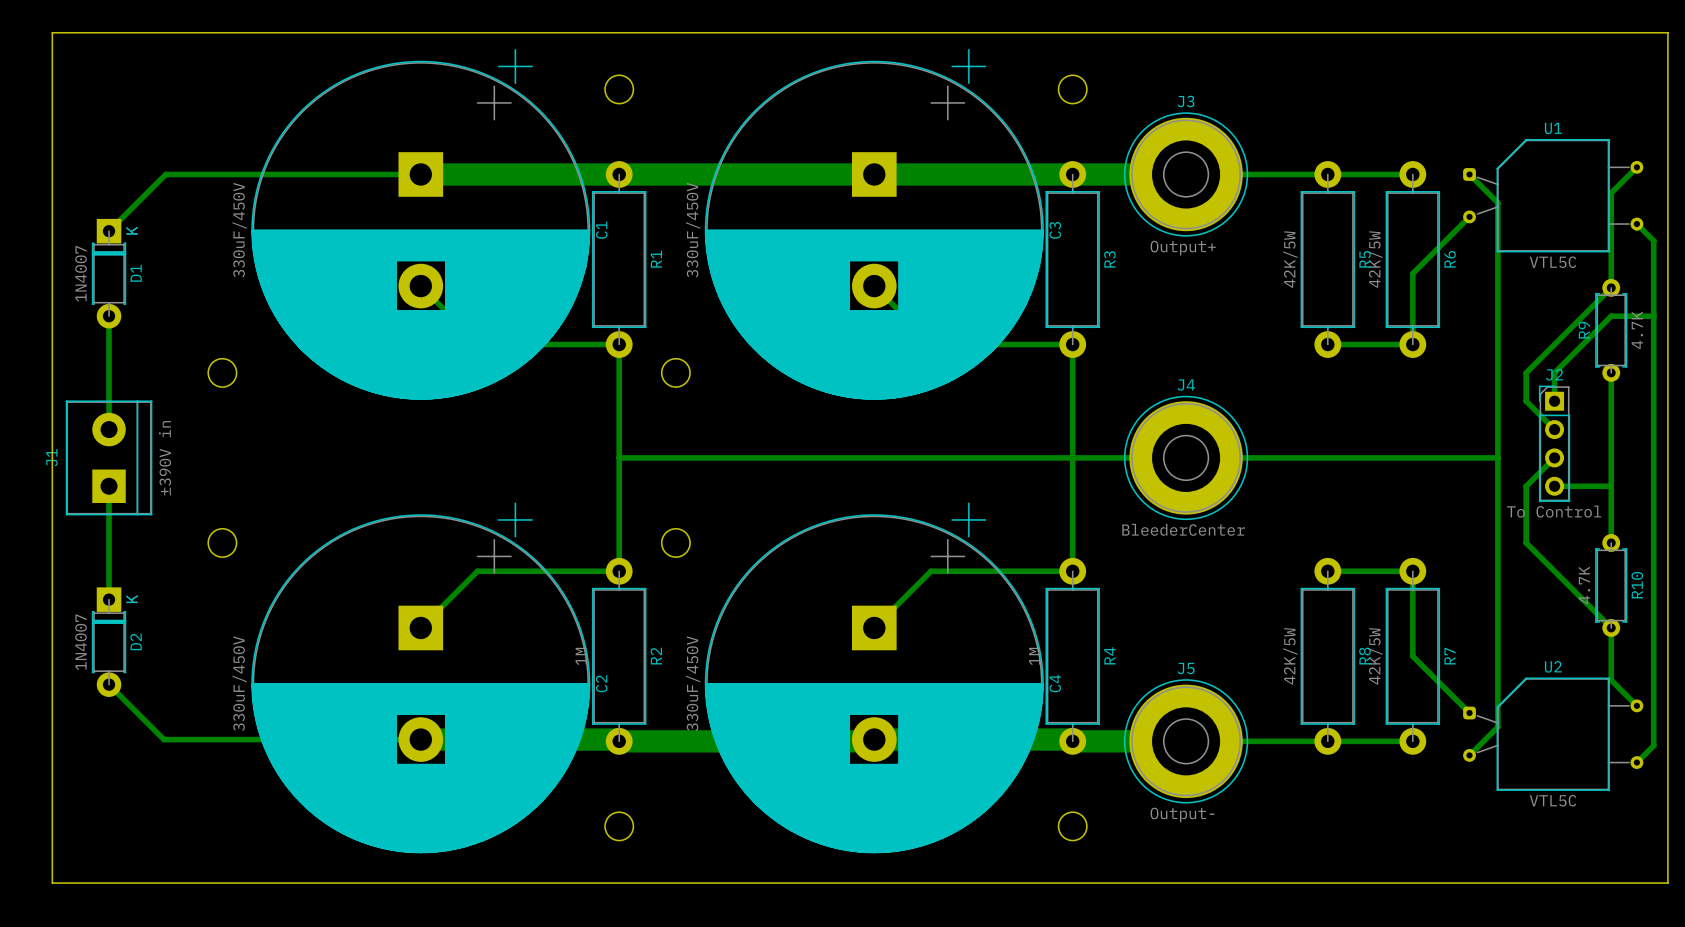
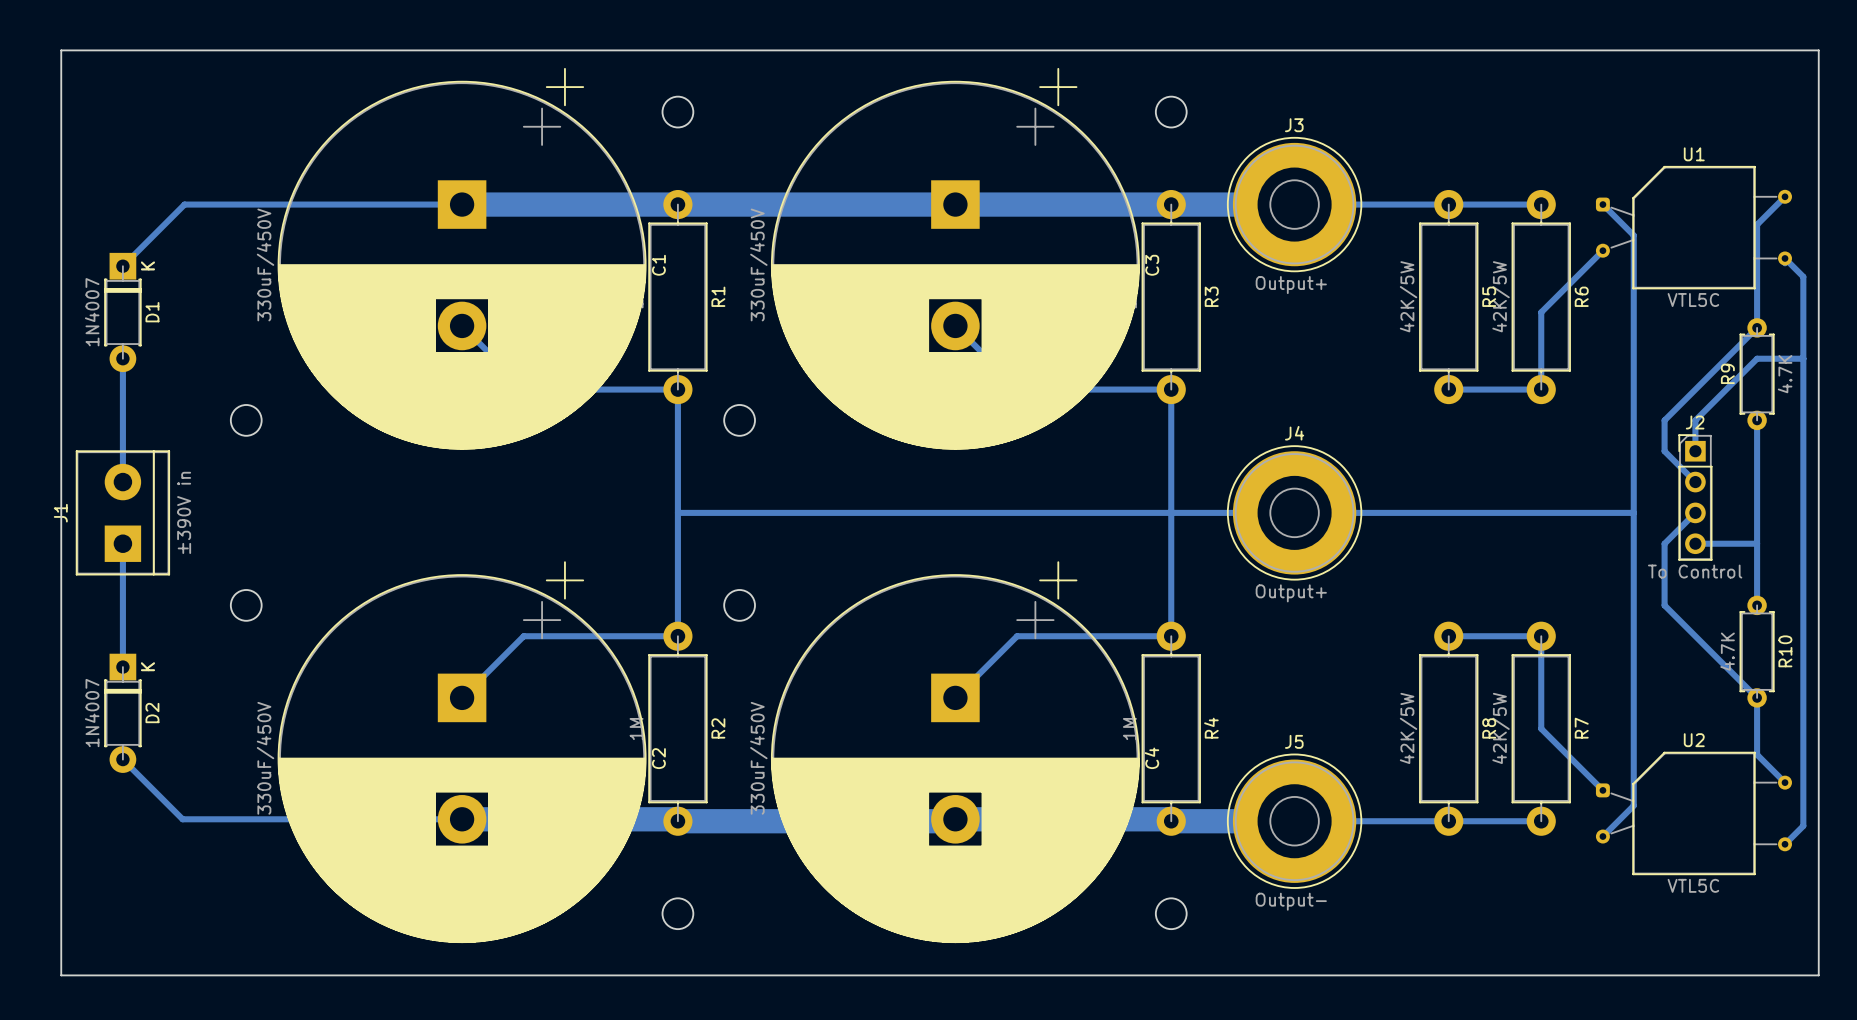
J4 value: BleederCenter (1183, 529) -> Output+ (1291, 593)

